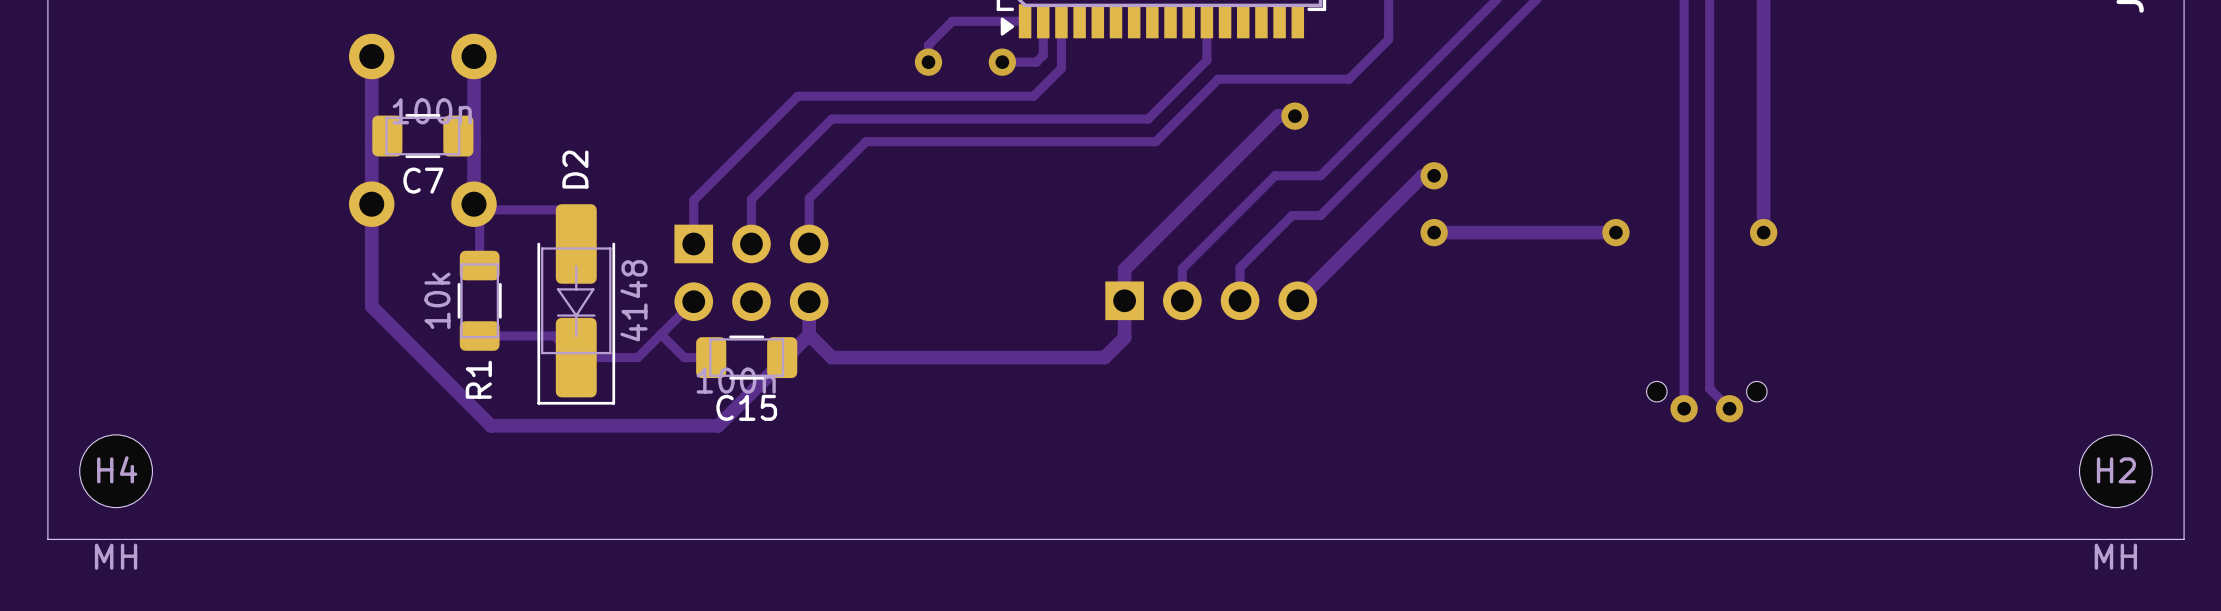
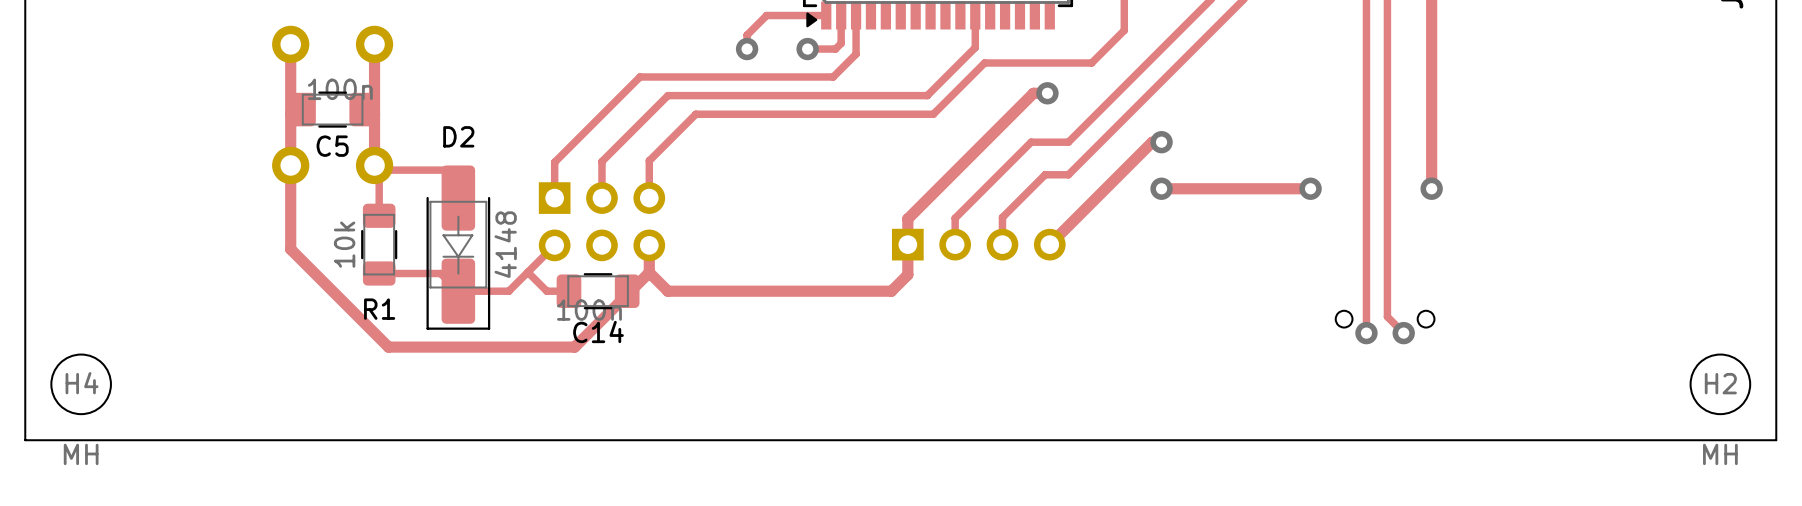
D2 name rotation: 0° (575, 169) -> 90° clockwise (458, 136)
C7 name: C7 (423, 180) -> C5 (332, 146)
R1 name rotation: 0° (478, 379) -> 90° clockwise (379, 309)
C15 name: C15 (746, 407) -> C14 (598, 331)

